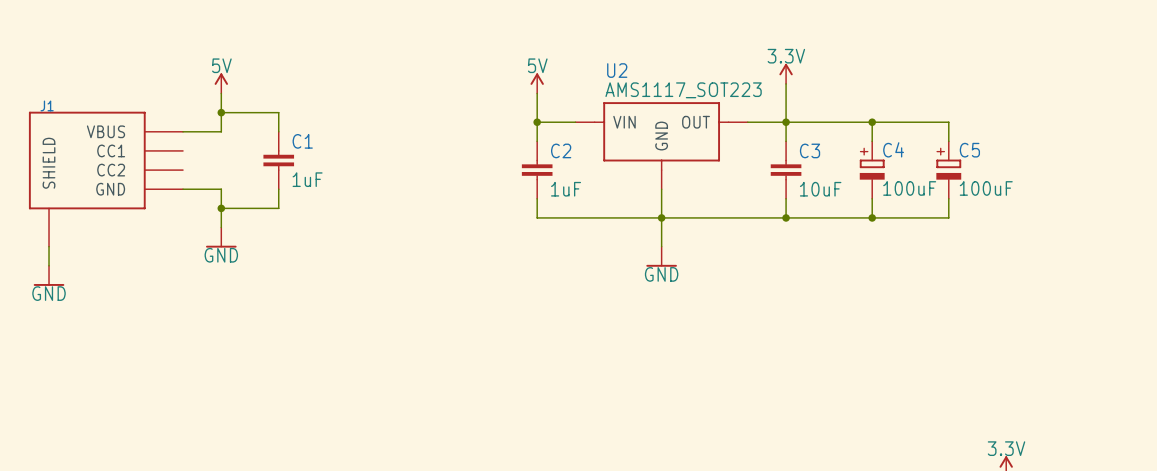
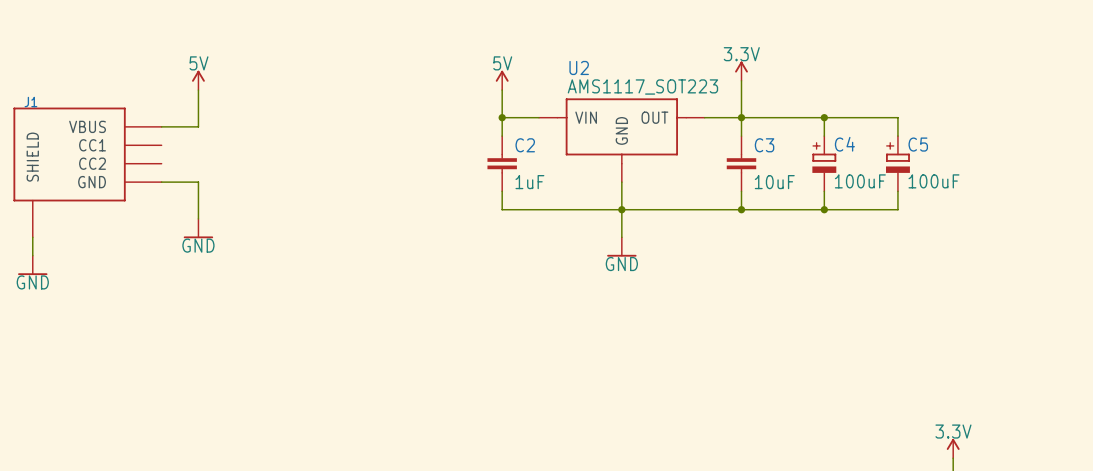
wire: (221, 112) (278, 112) (278, 131) -> none
junction: (221, 112) -> none
C1: 1uF (278, 160) -> none
wire: (278, 189) (278, 208) (221, 208) -> none
junction: (221, 208) -> none

